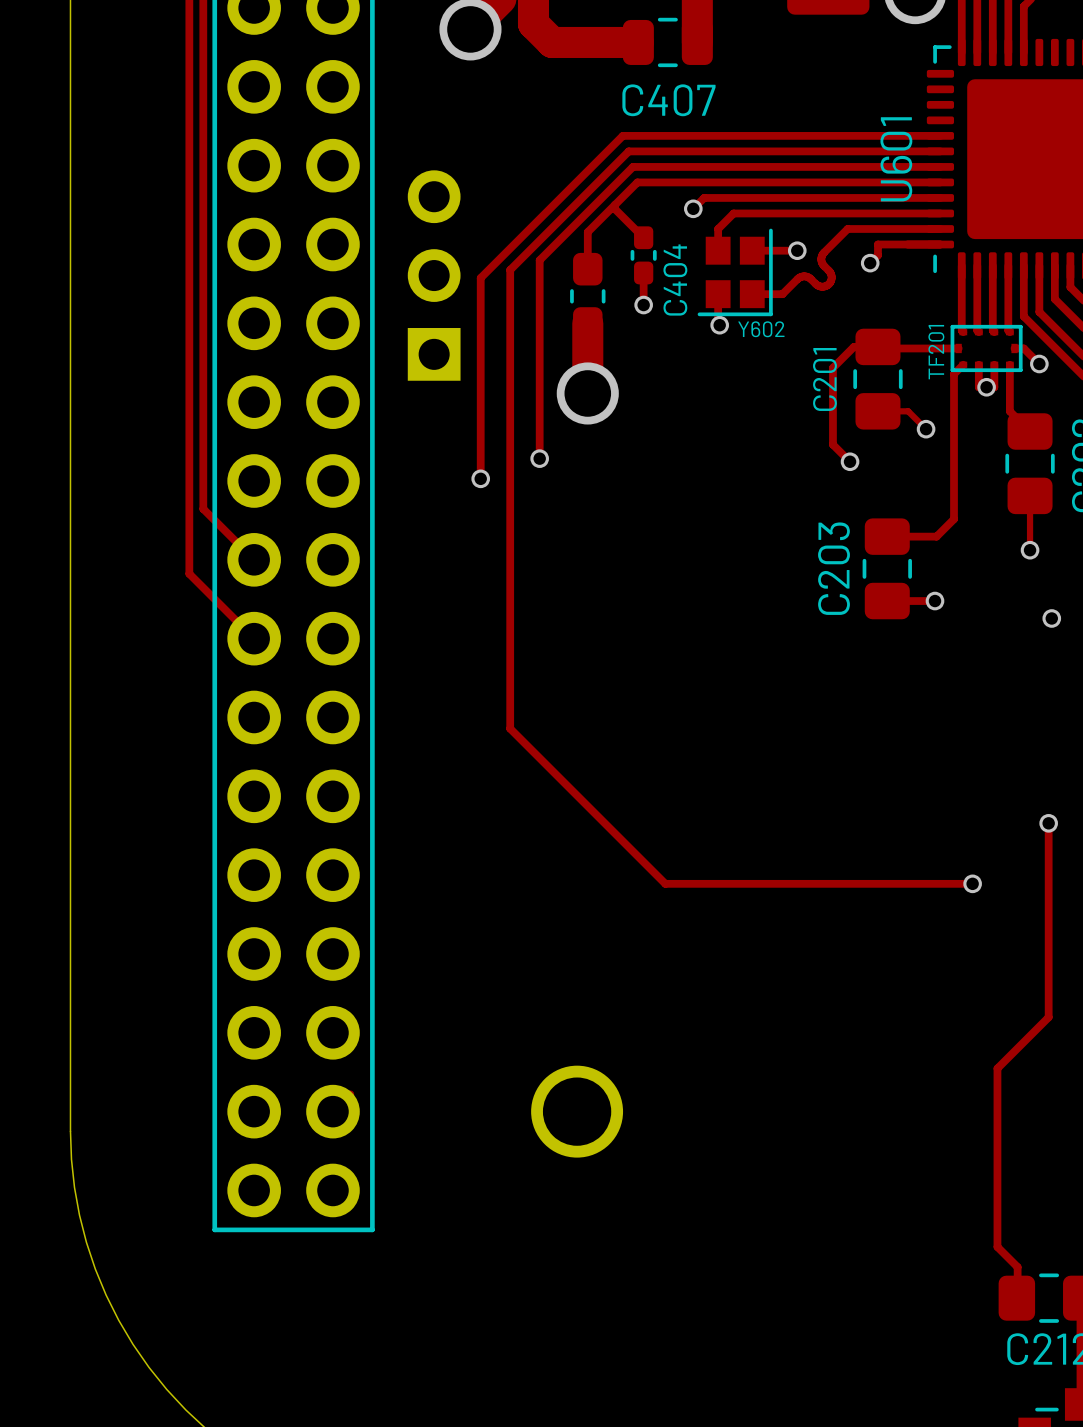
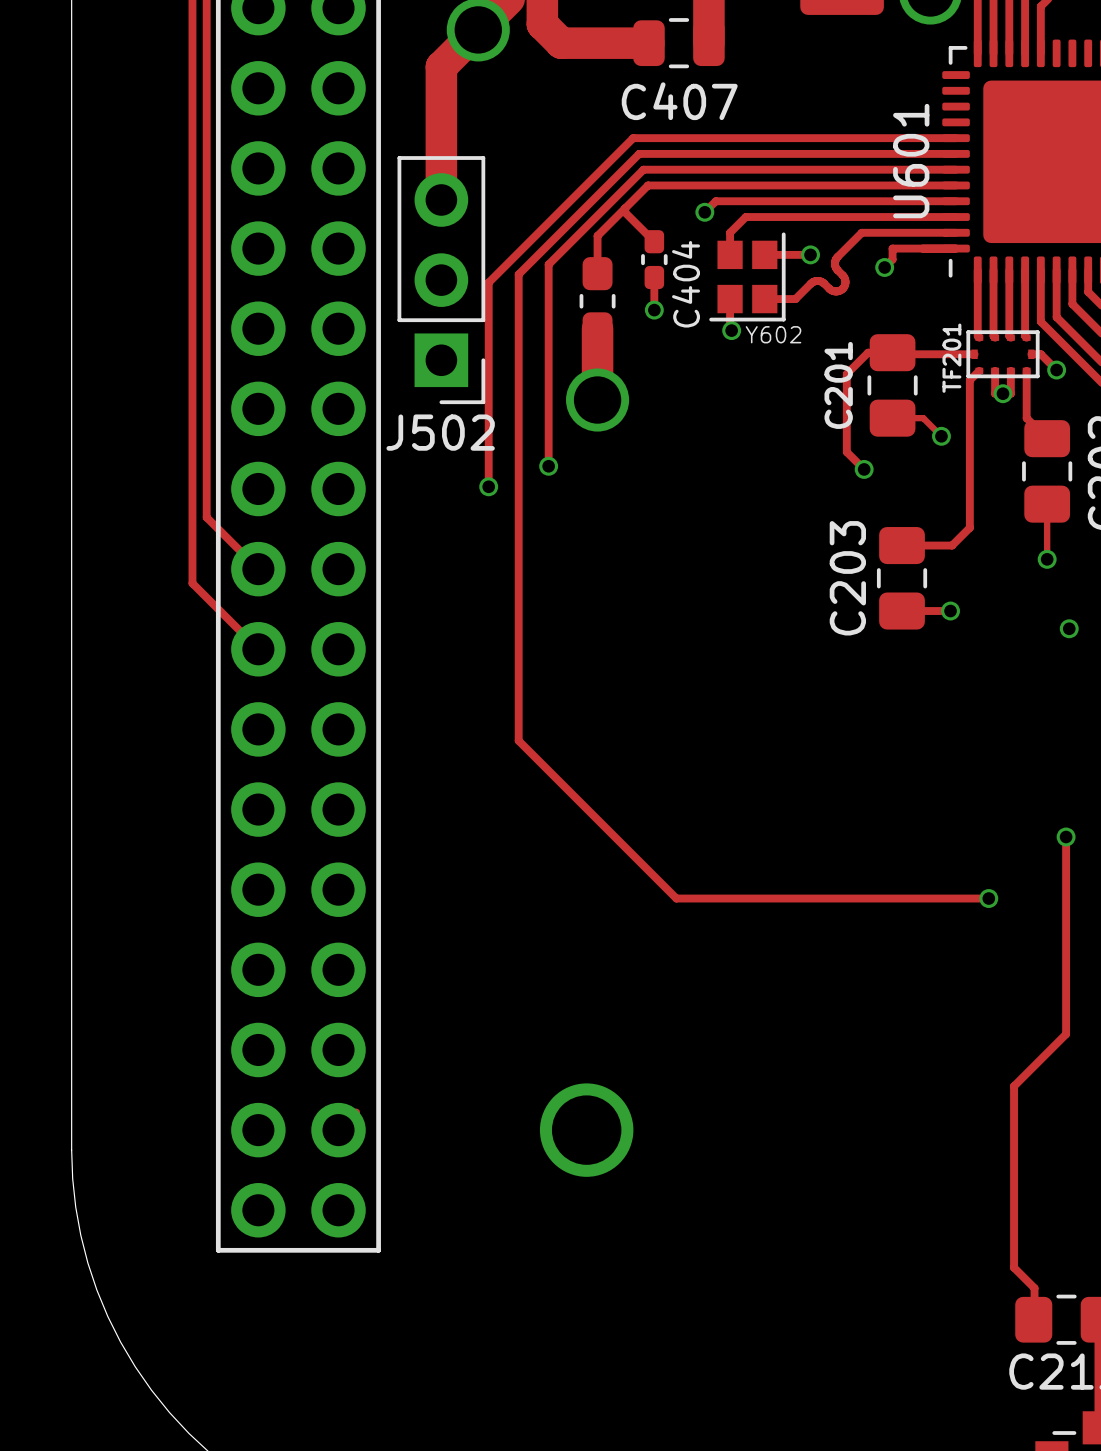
track: none -> (478, 29) (441, 66) (441, 199)
J502 side: bottom (434, 275) -> top (441, 280)

